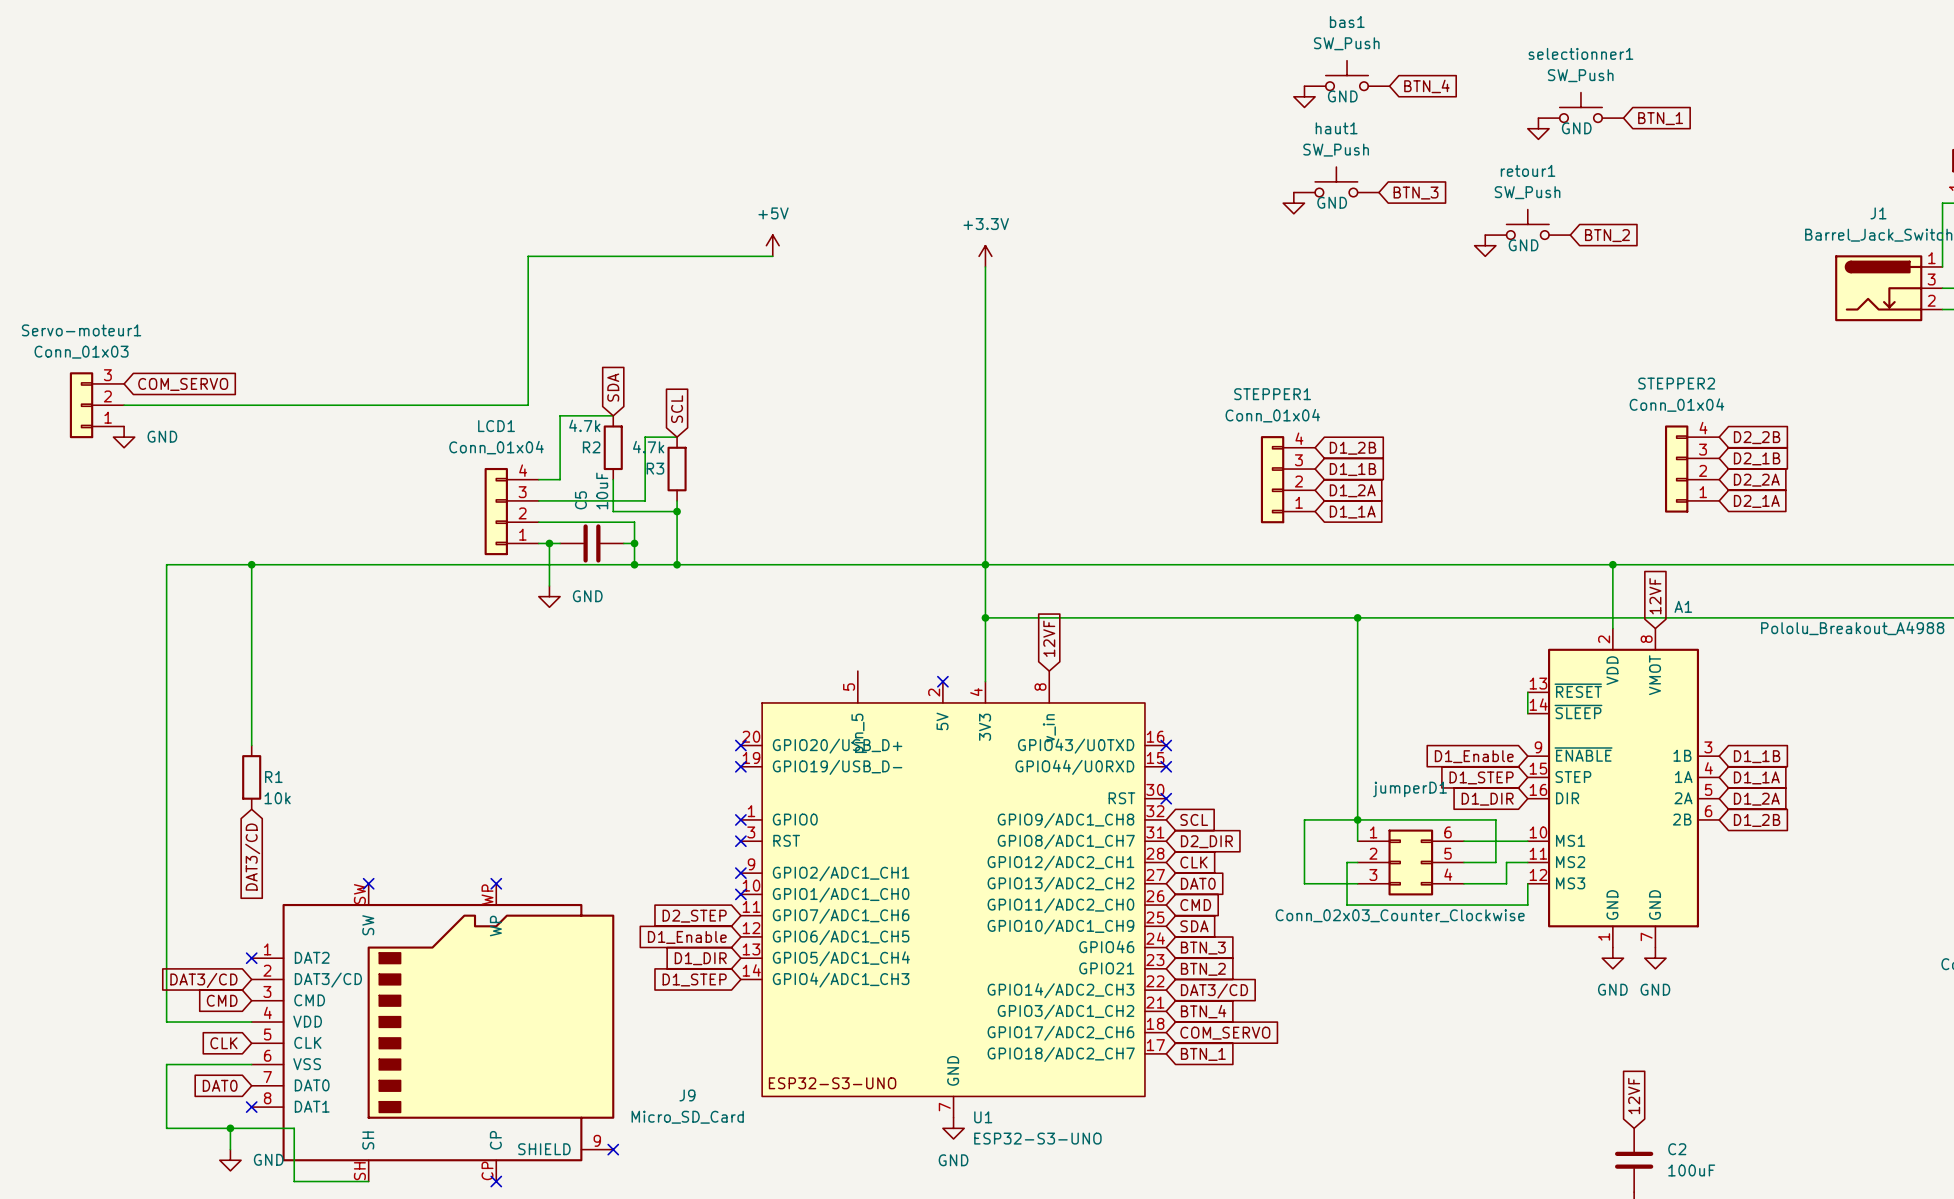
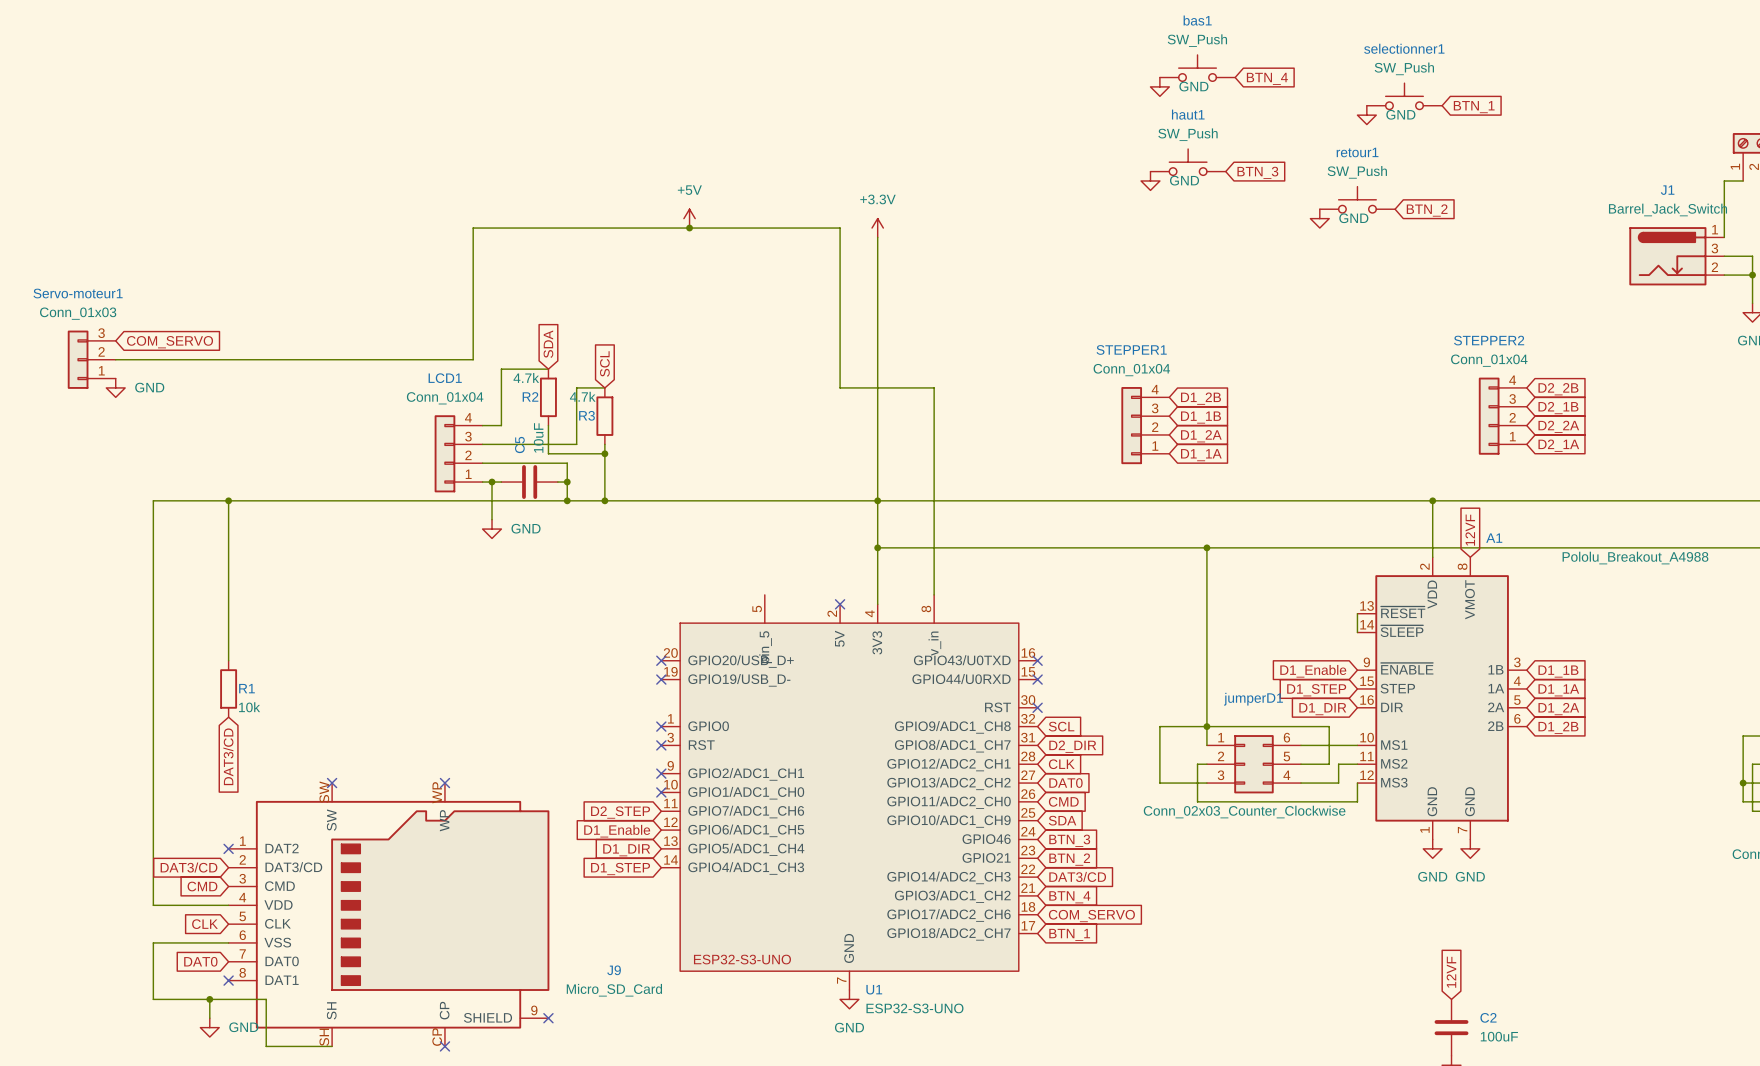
wire: none -> (689, 228) (840, 228) (840, 387) (934, 387) (934, 594)
junction: none -> (689, 228)
global label: 12VF (1049, 638) -> none

